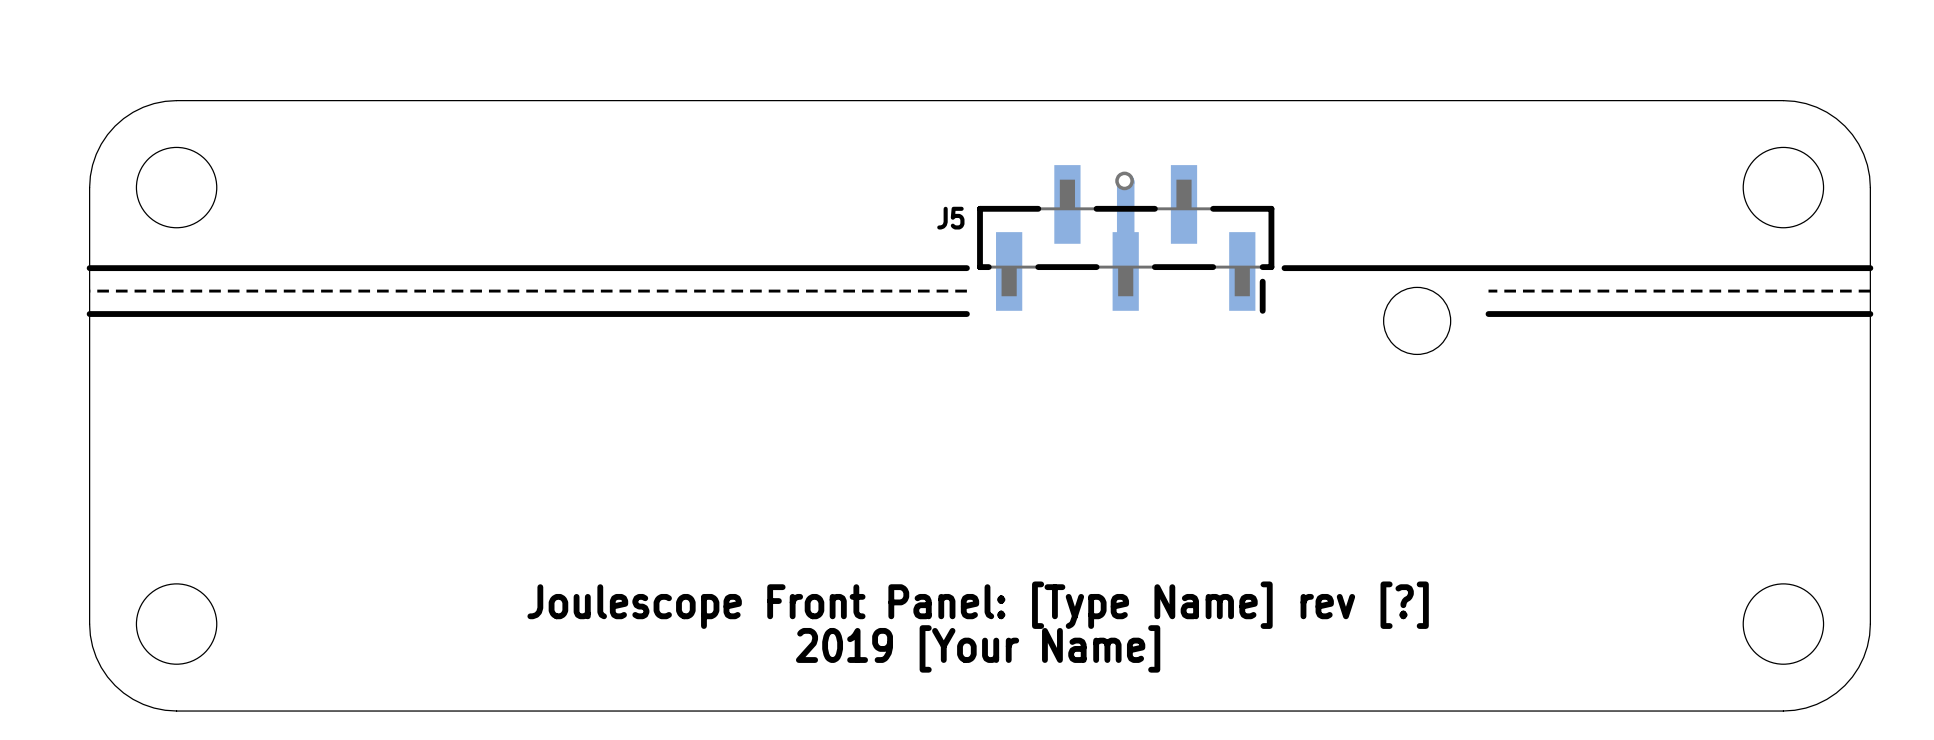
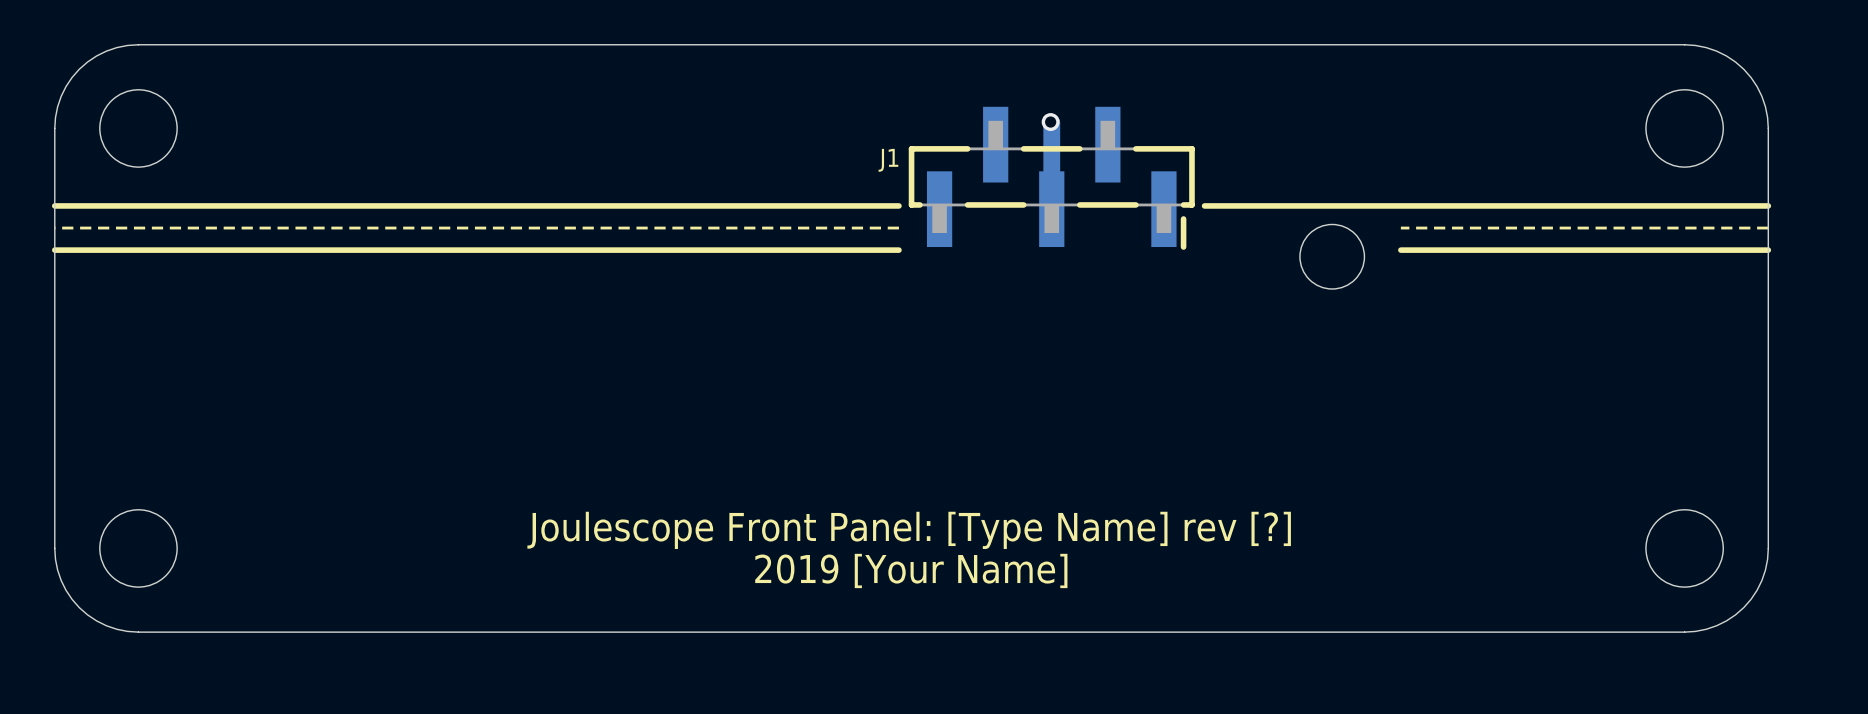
J5 name: J5 (950, 218) -> J1 (888, 160)

